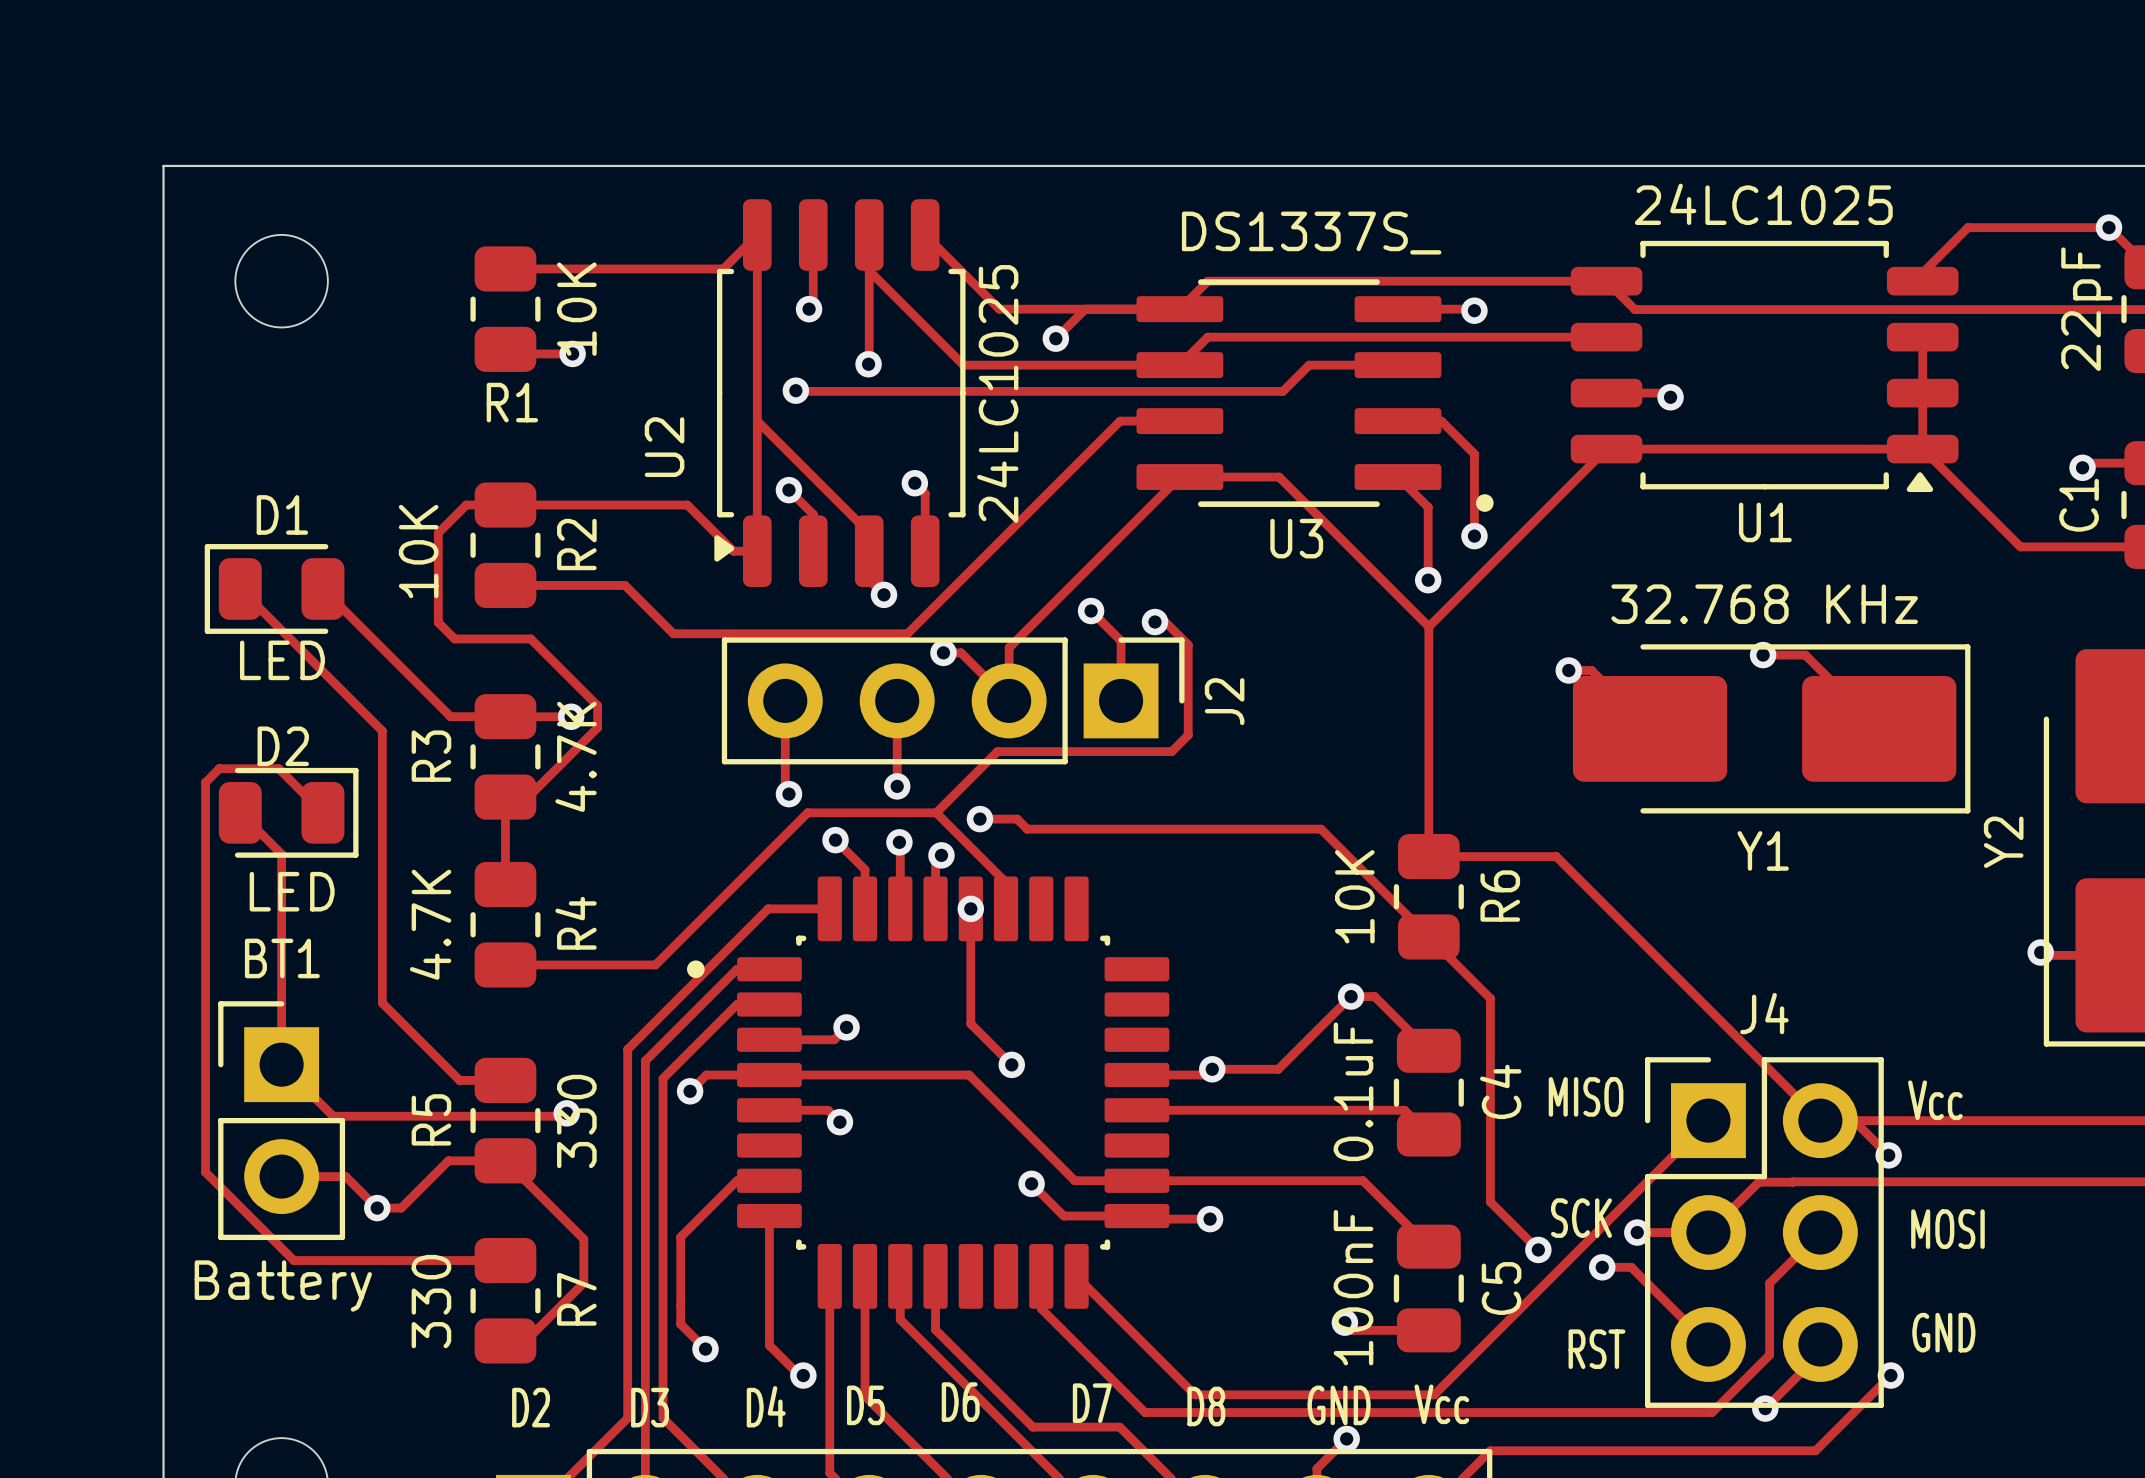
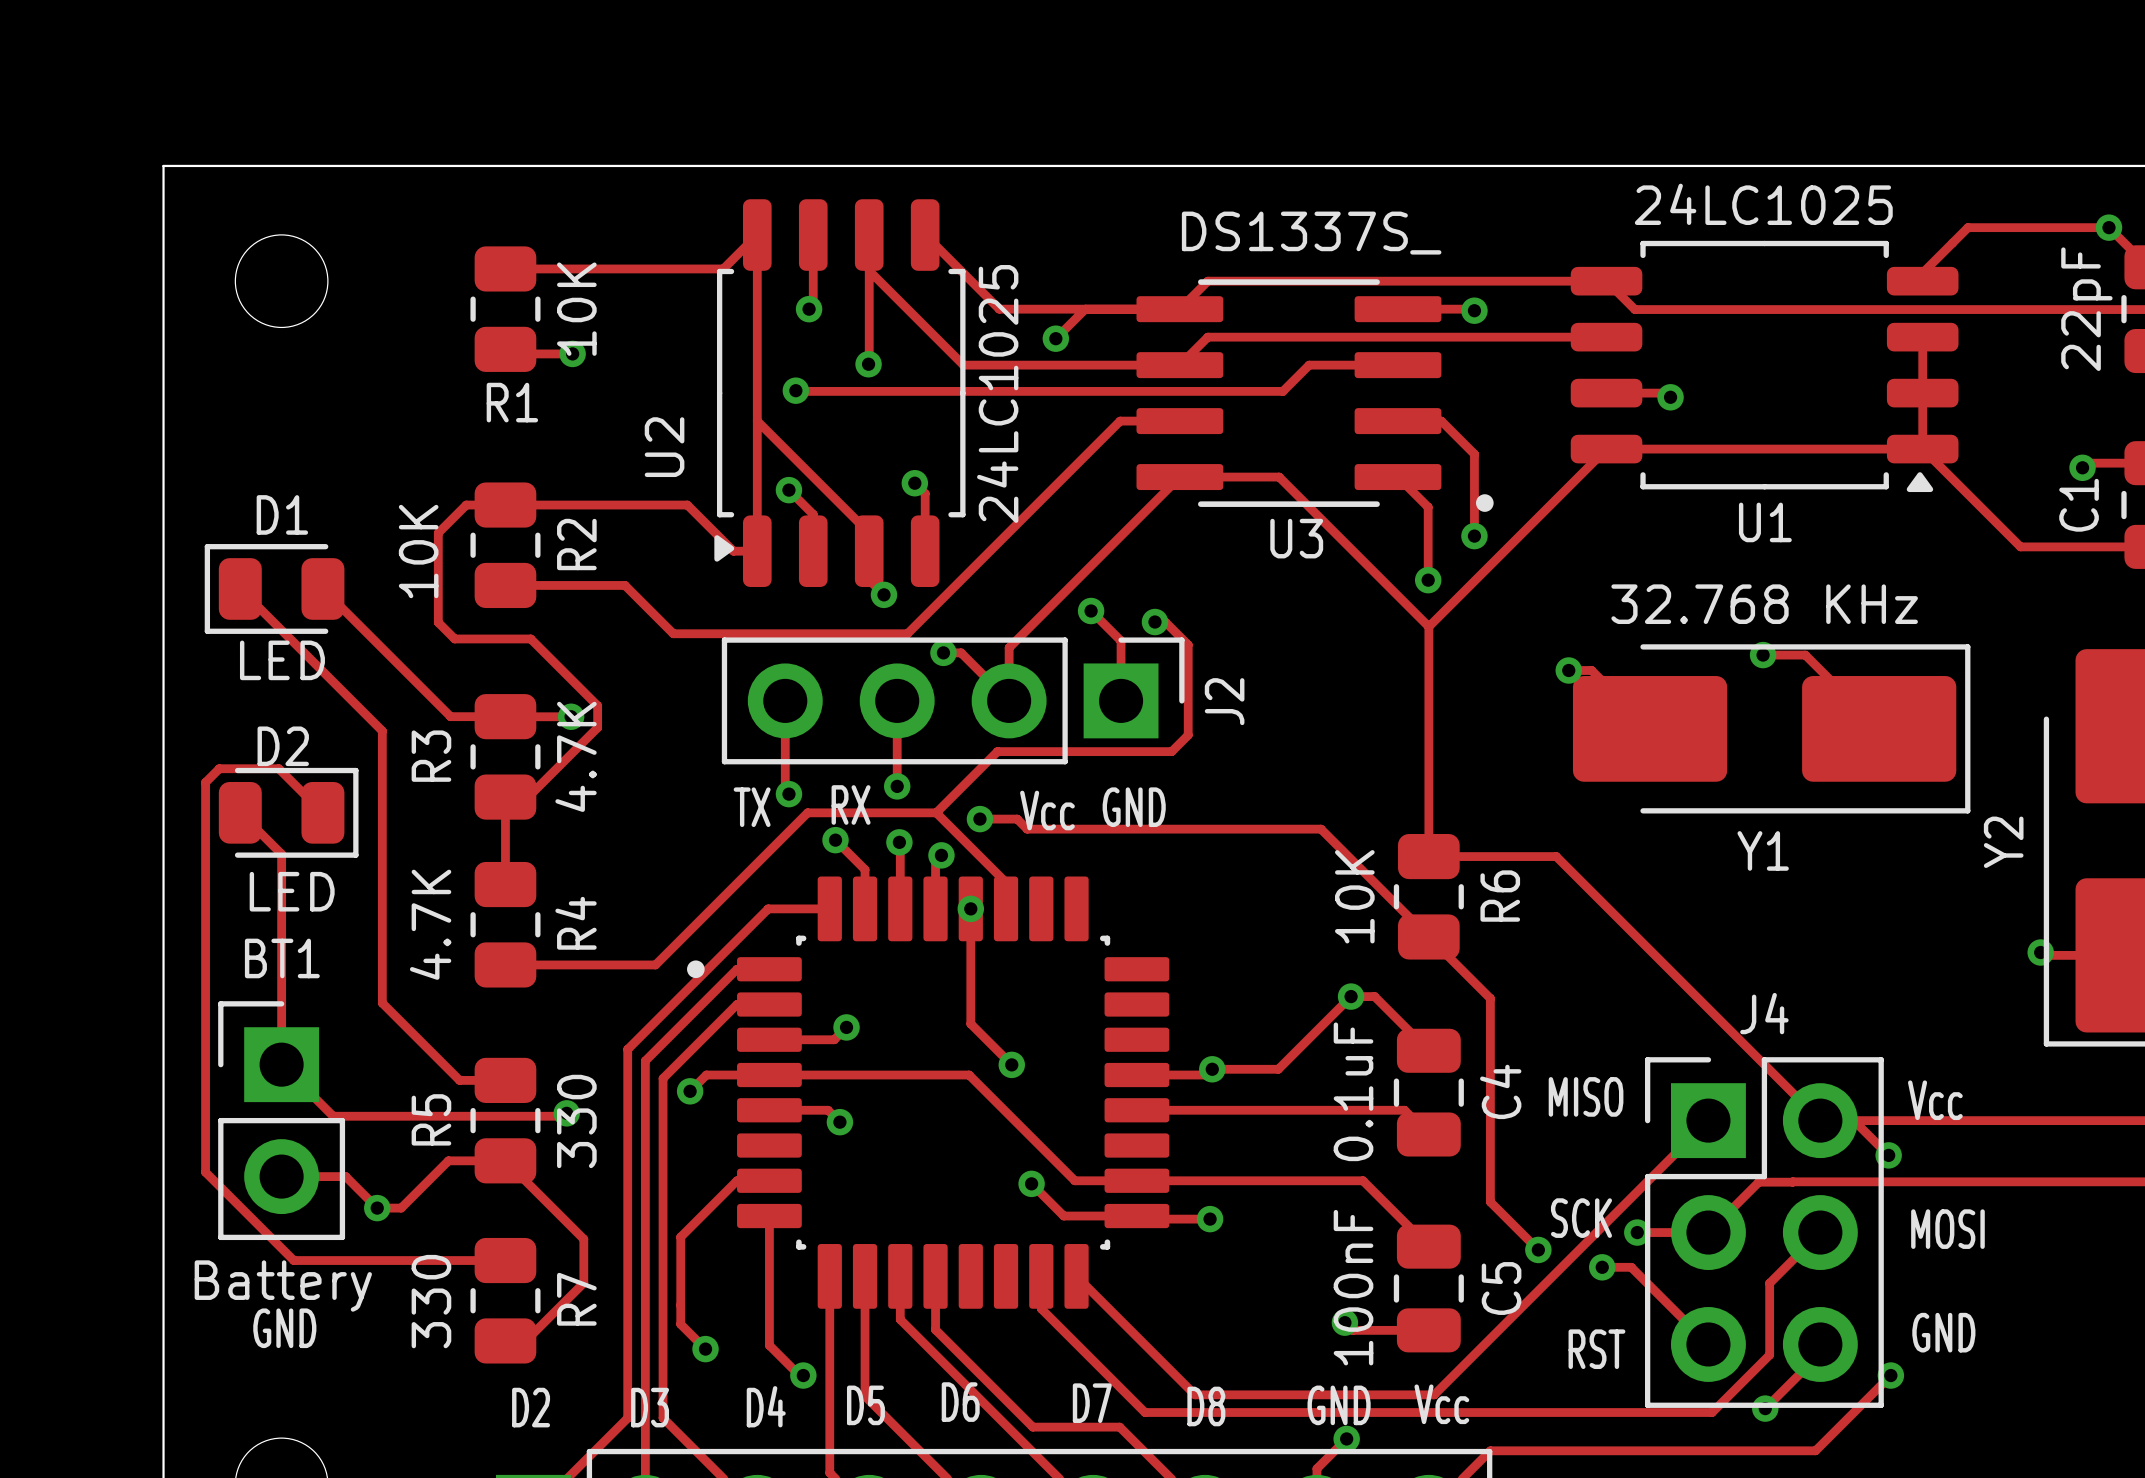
text: none -> RX (851, 804)
text: none -> TX (752, 807)
text: none -> GND (1134, 807)
text: none -> Vcc (1047, 810)
text: none -> GND (284, 1328)

